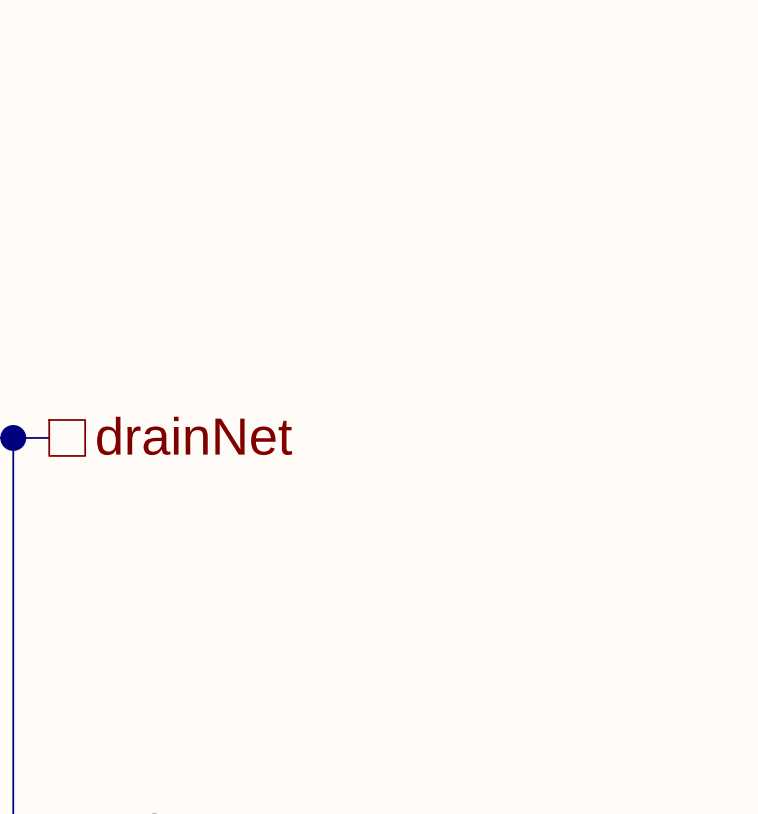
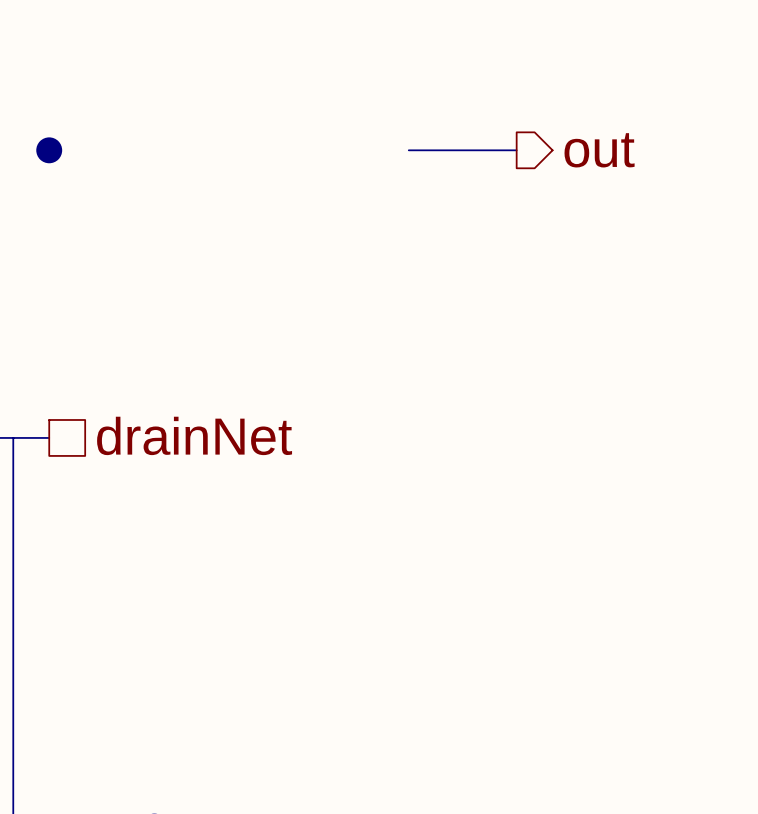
junction: none -> (49, 150)
wire: none -> (408, 150) (516, 150)
hierarchical label: none -> out (599, 150)
junction: (13, 437) -> none

